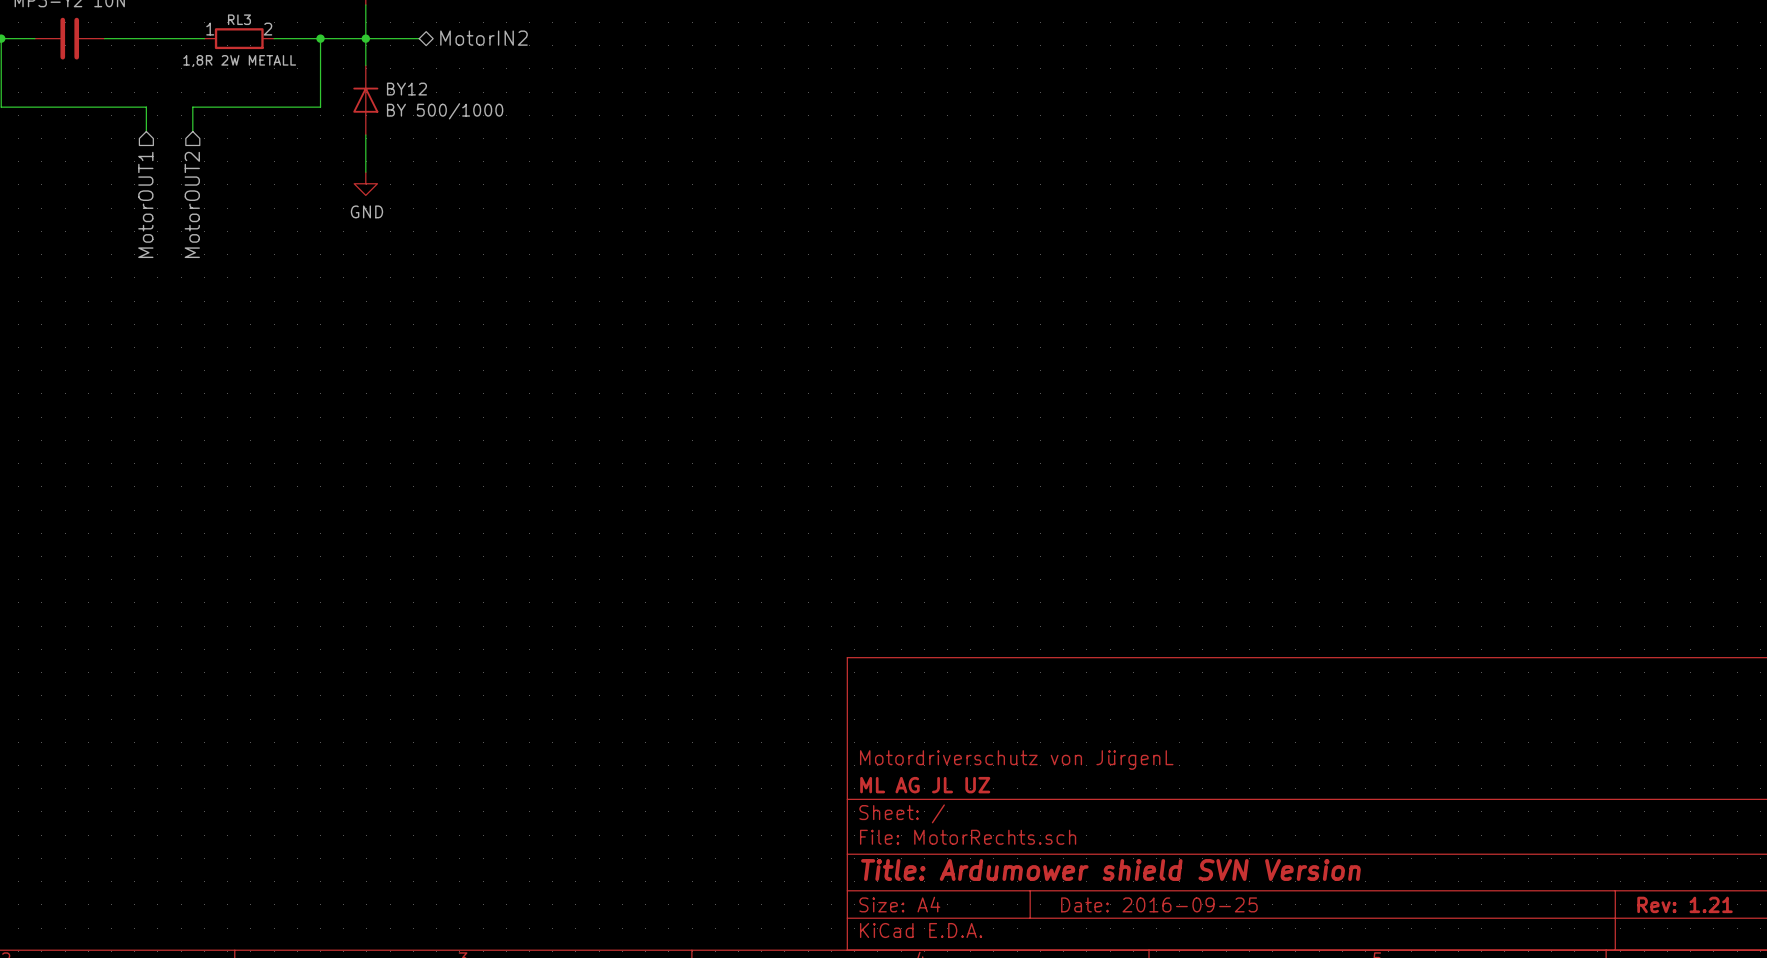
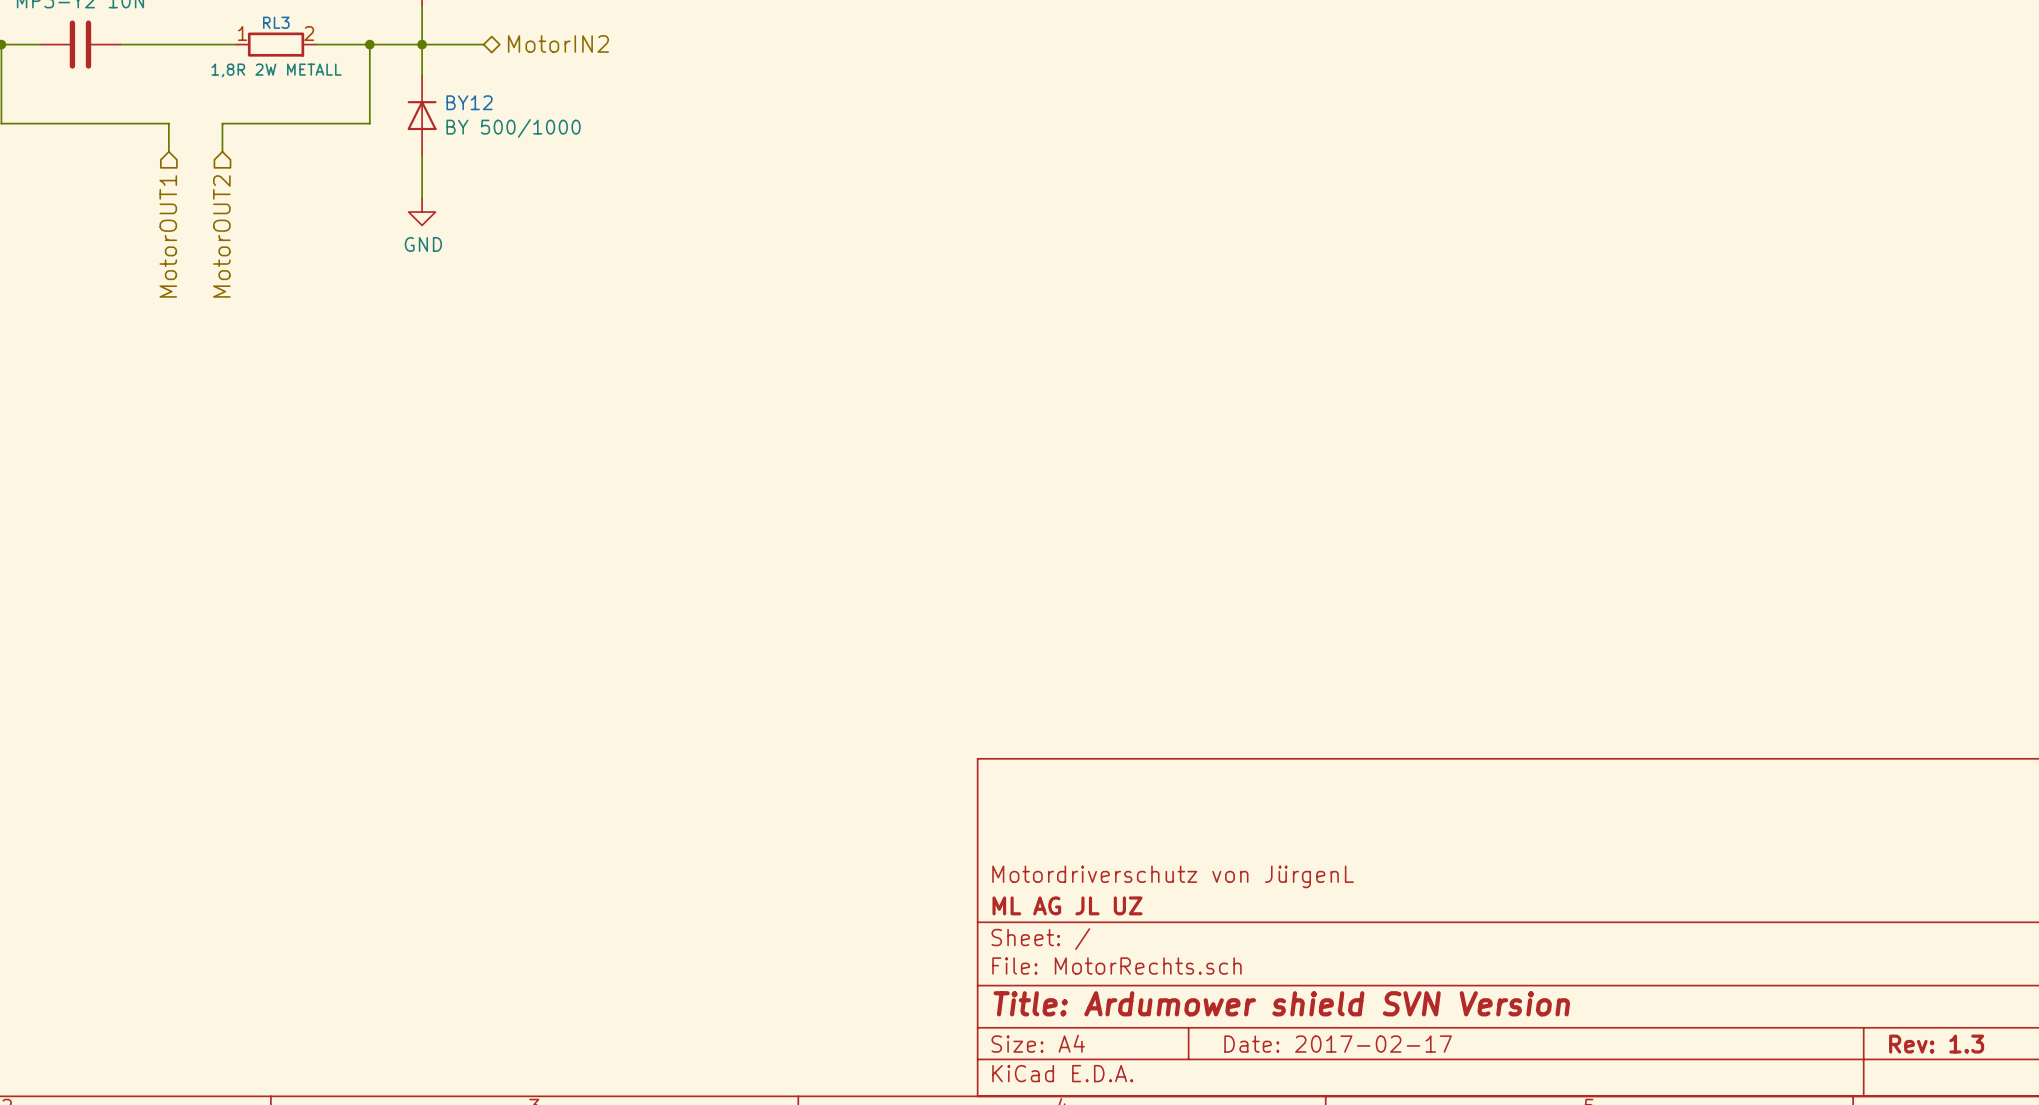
title block: Date: 2016-09-25 (1159, 904) -> Date: 2017-02-17 (1338, 1044)
title block: Rev: 1.21 (1685, 904) -> Rev: 1.3 (1936, 1044)

